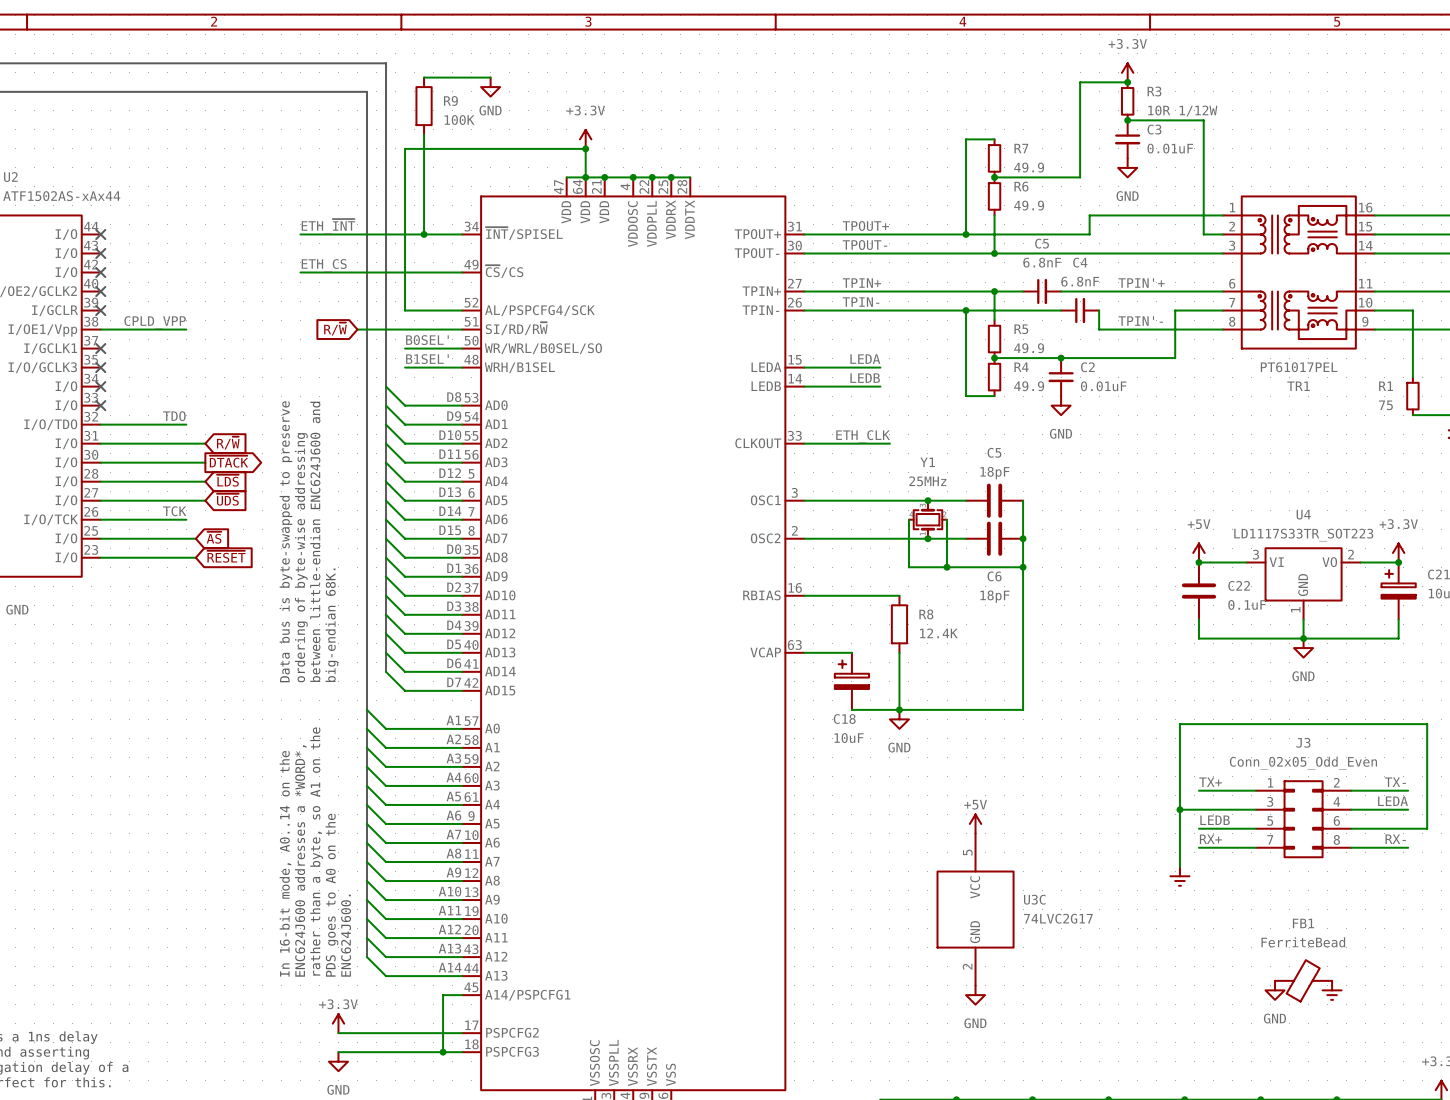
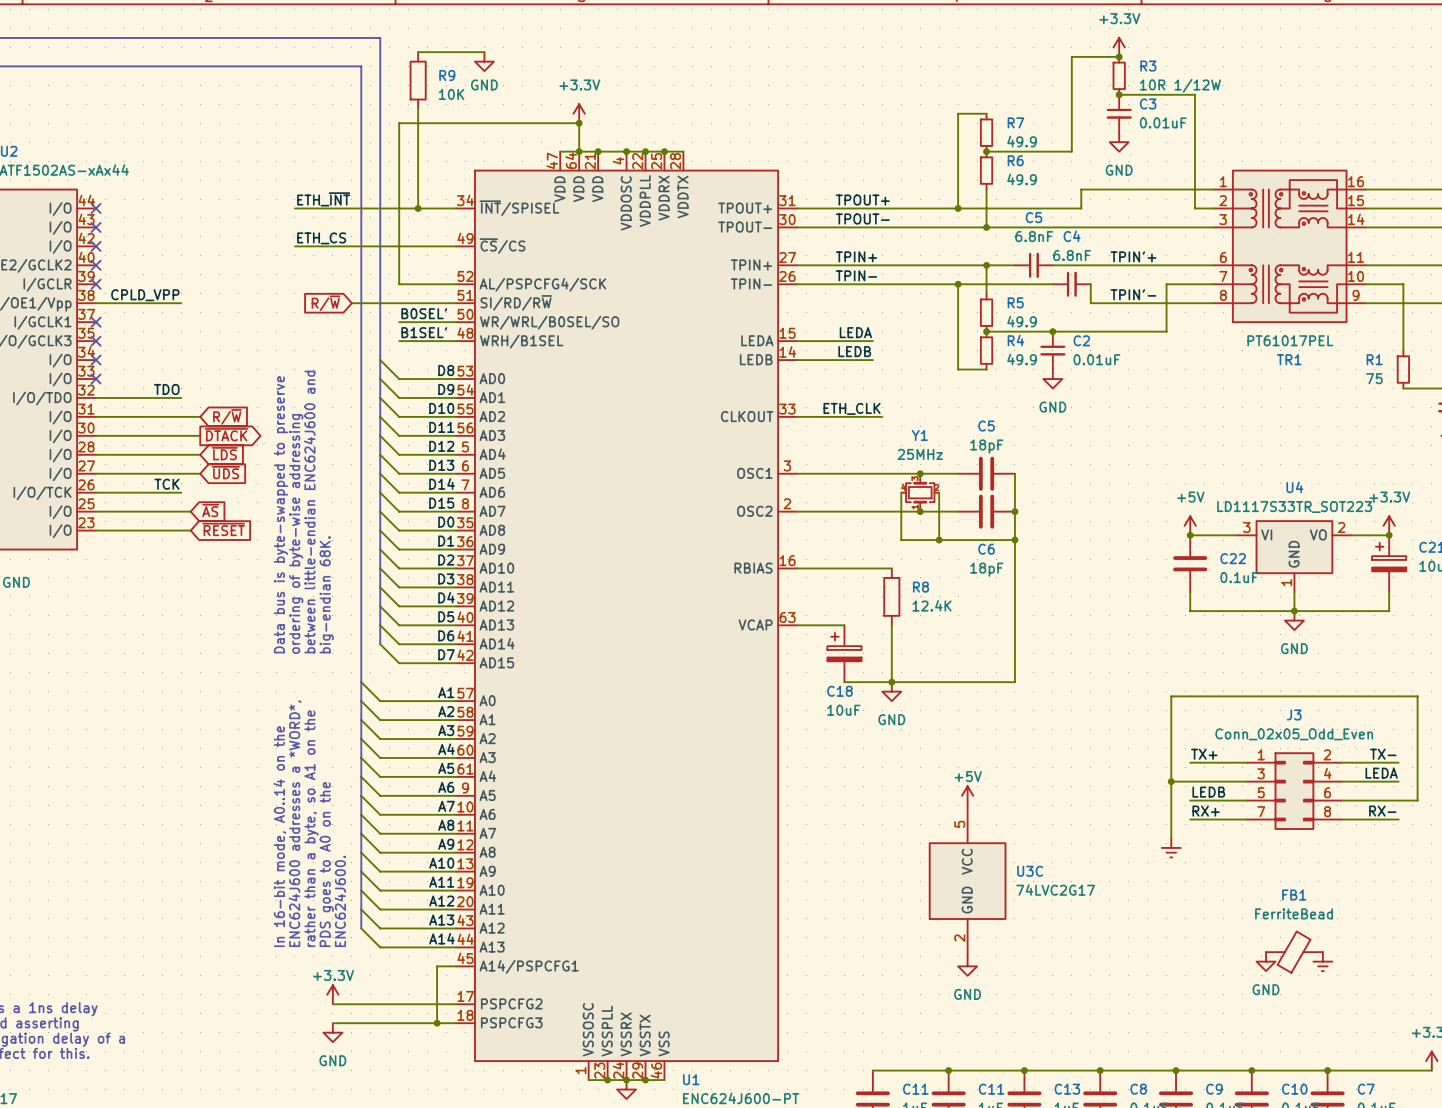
R9 value: 100K (459, 120) -> 10K (451, 94)

